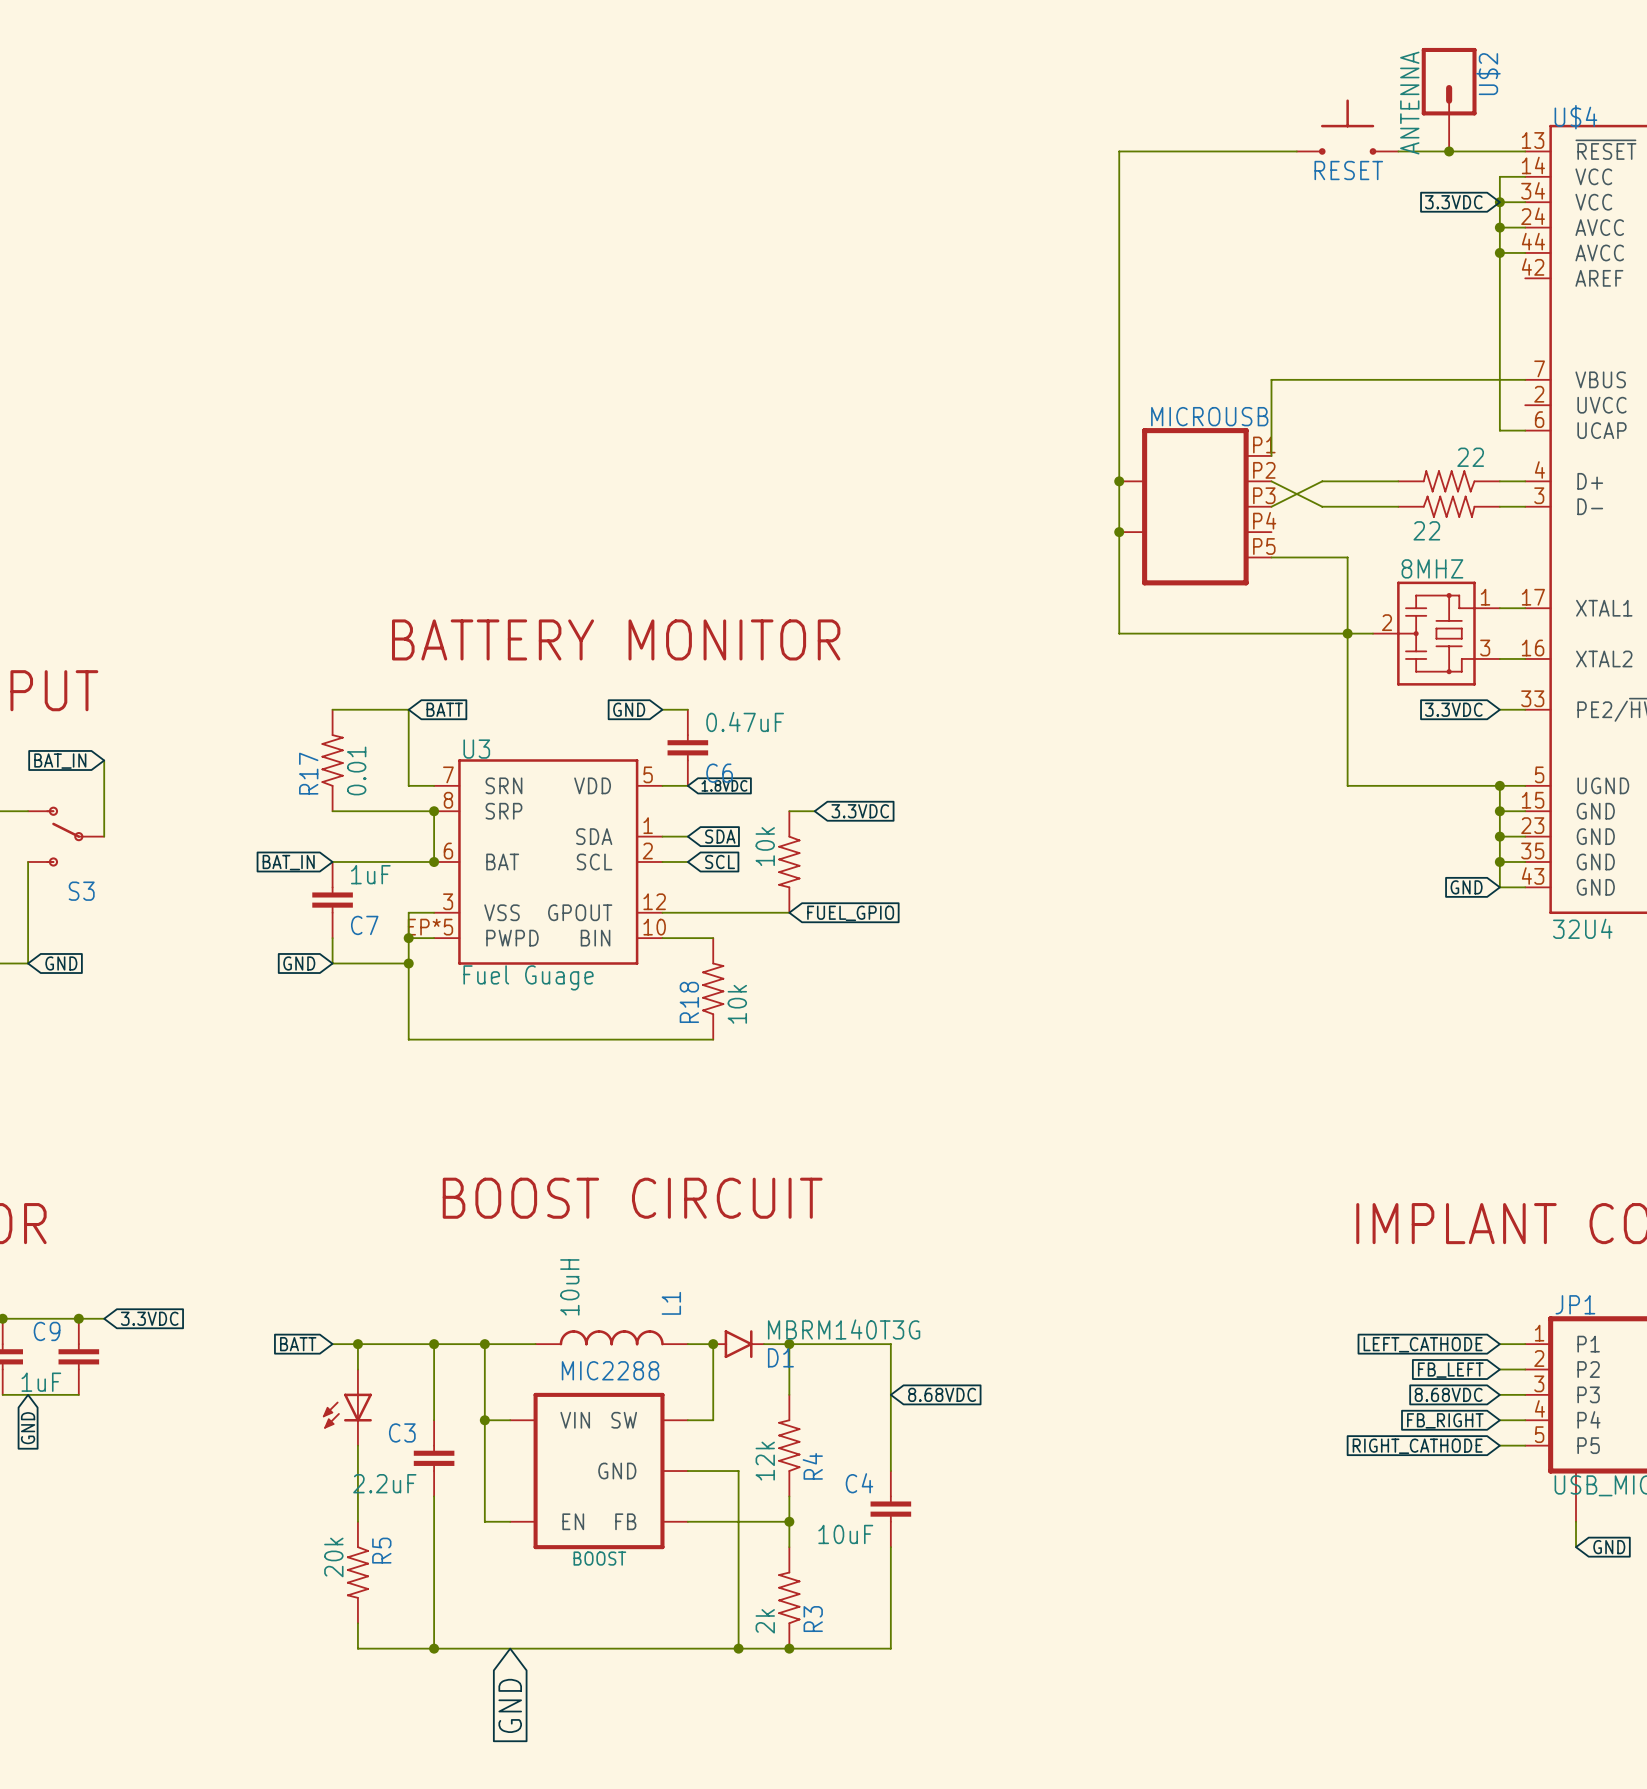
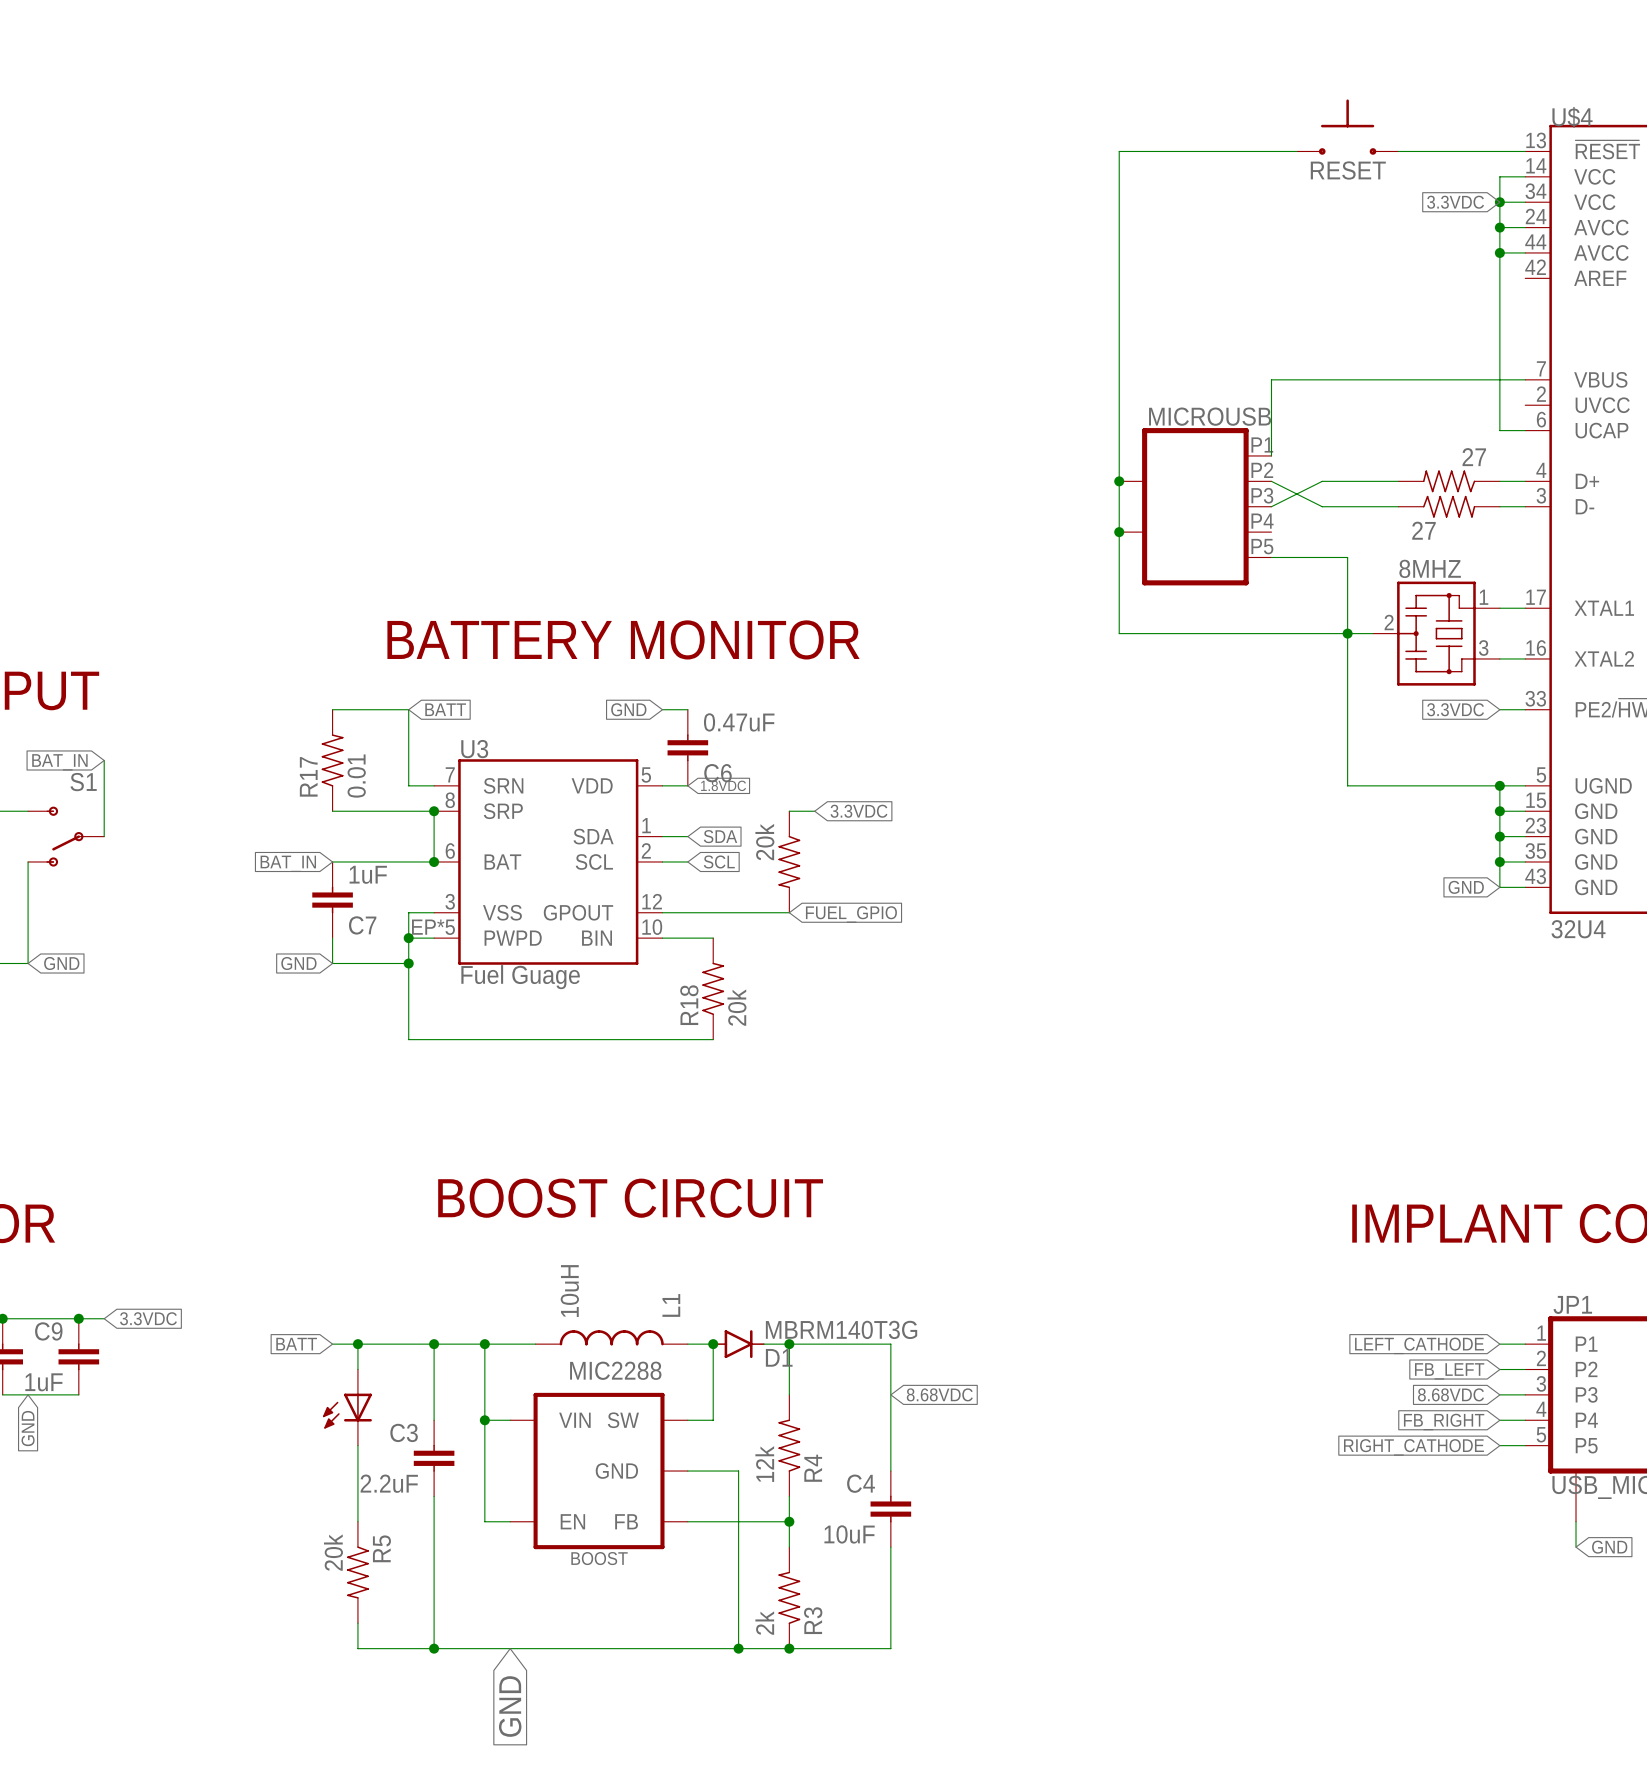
U$2: ANTENNA (1449, 99) -> none
junction: (1449, 151) -> none
part value: 22 (1470, 457) -> 27 (1474, 457)
part value: 22 (1426, 530) -> 27 (1423, 530)
S3: (66, 836) -> none
S1: none -> (66, 836)
part value: 10k (765, 846) -> 20k (764, 842)
R18 value: 10k (737, 1004) -> 20k (736, 1007)

